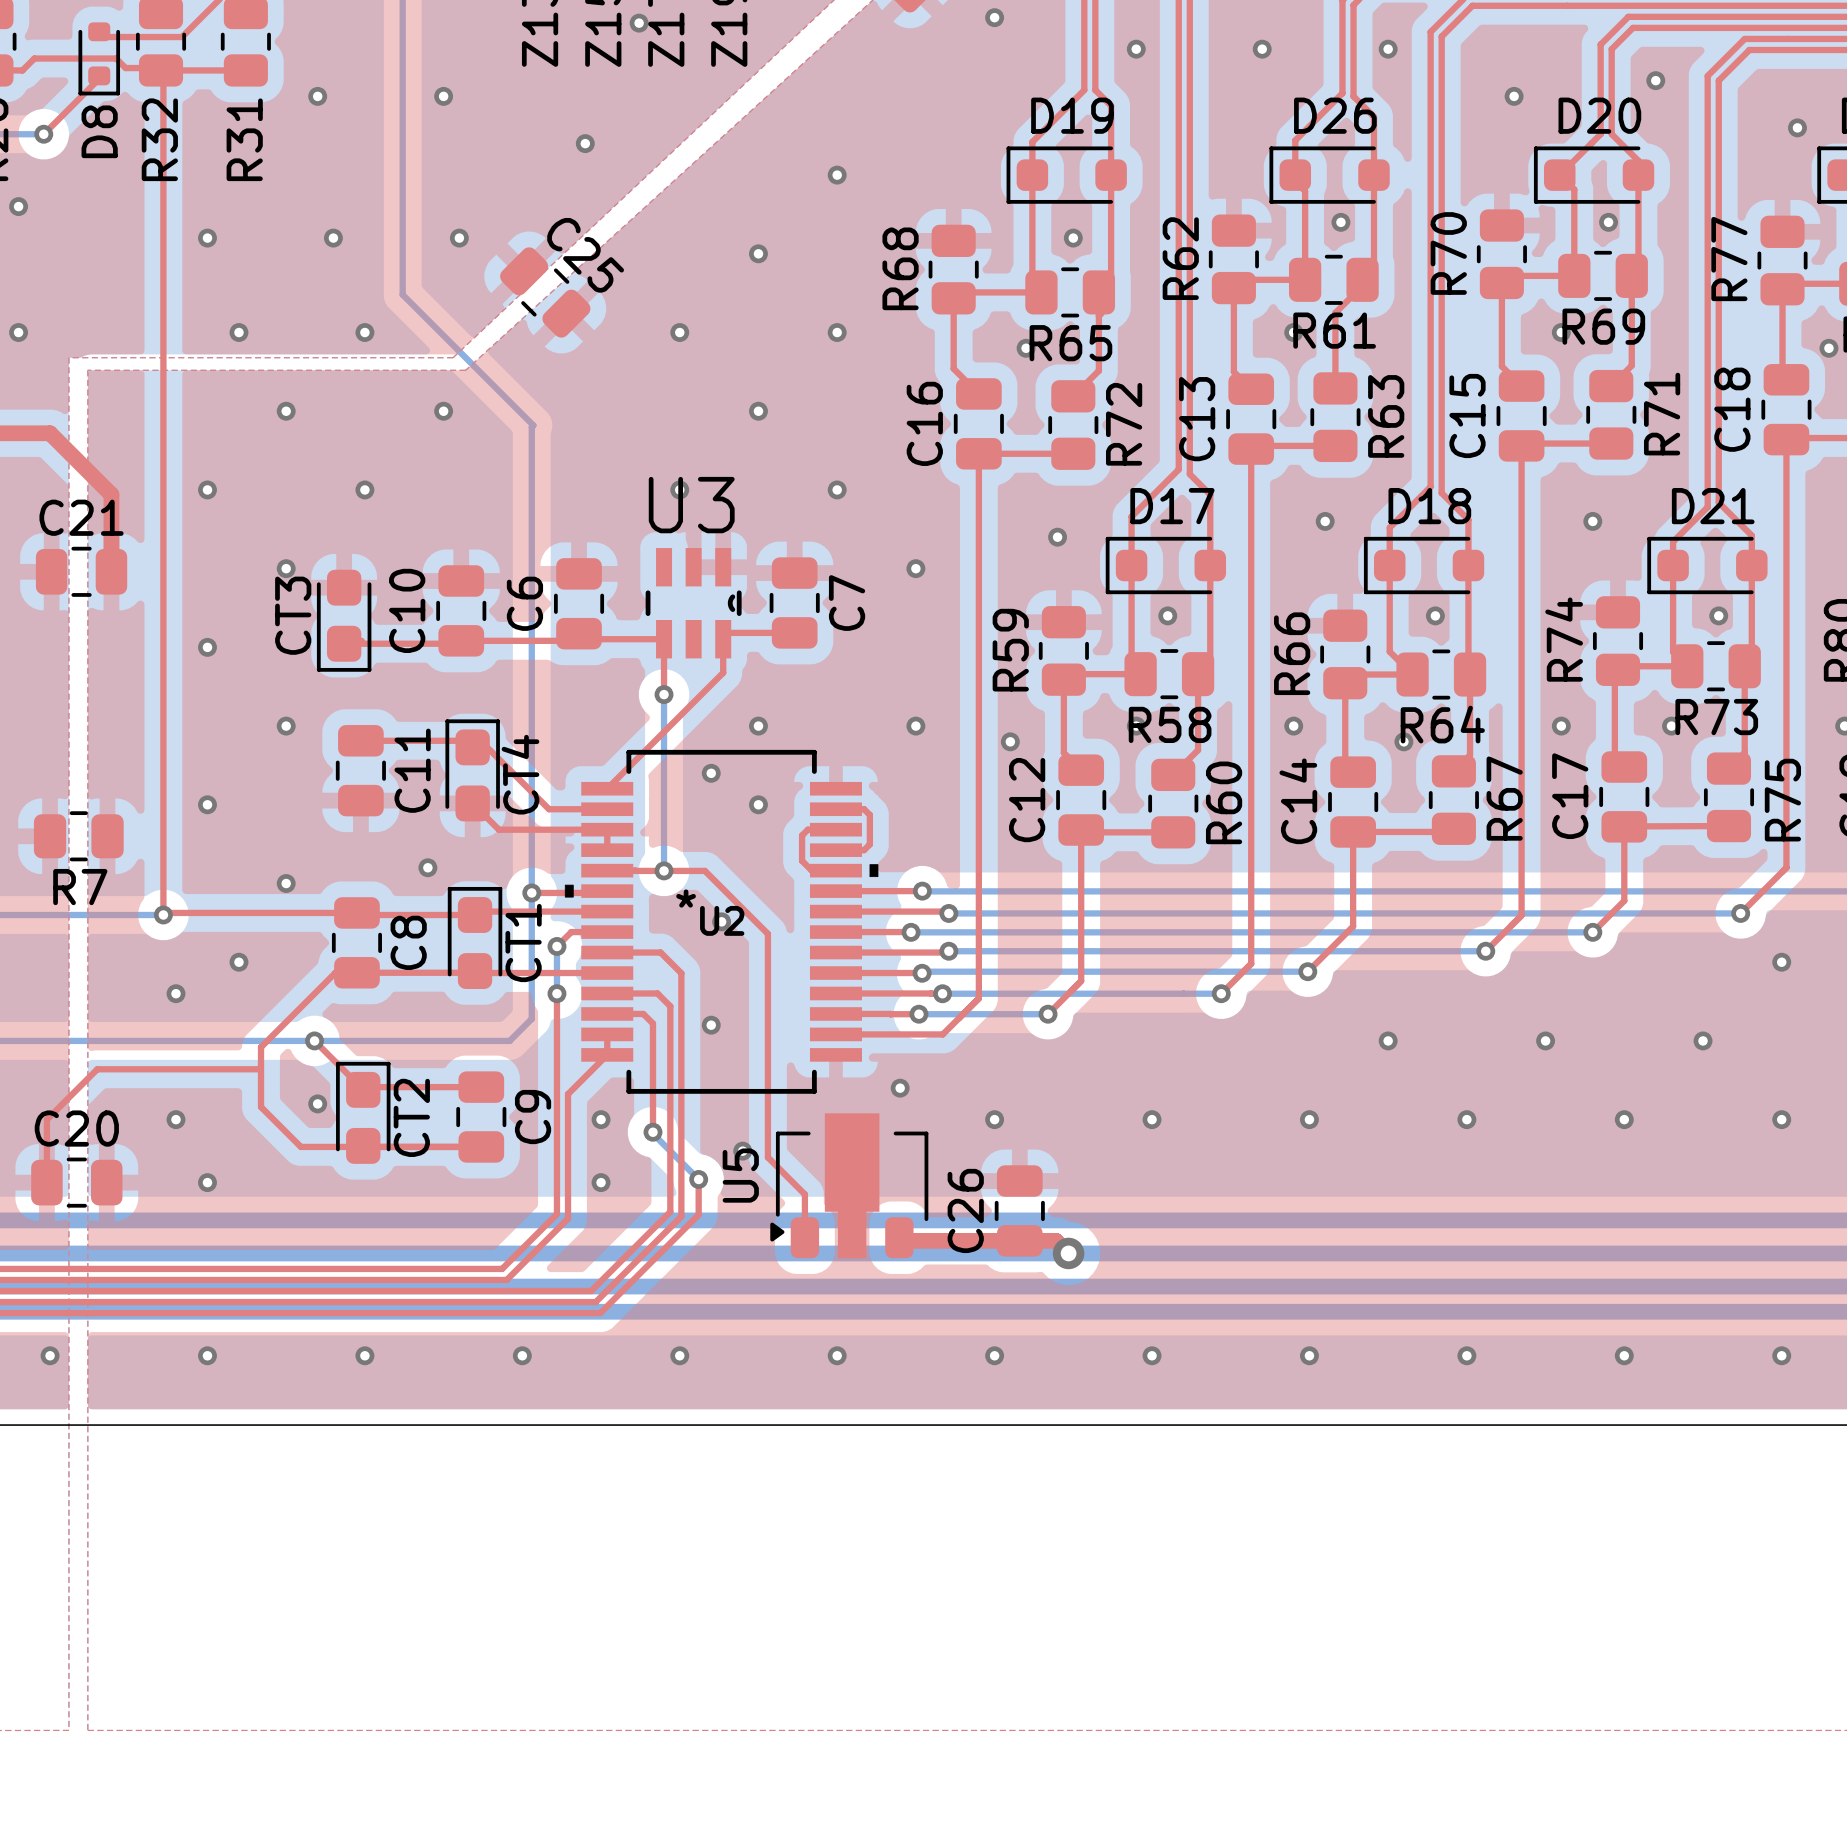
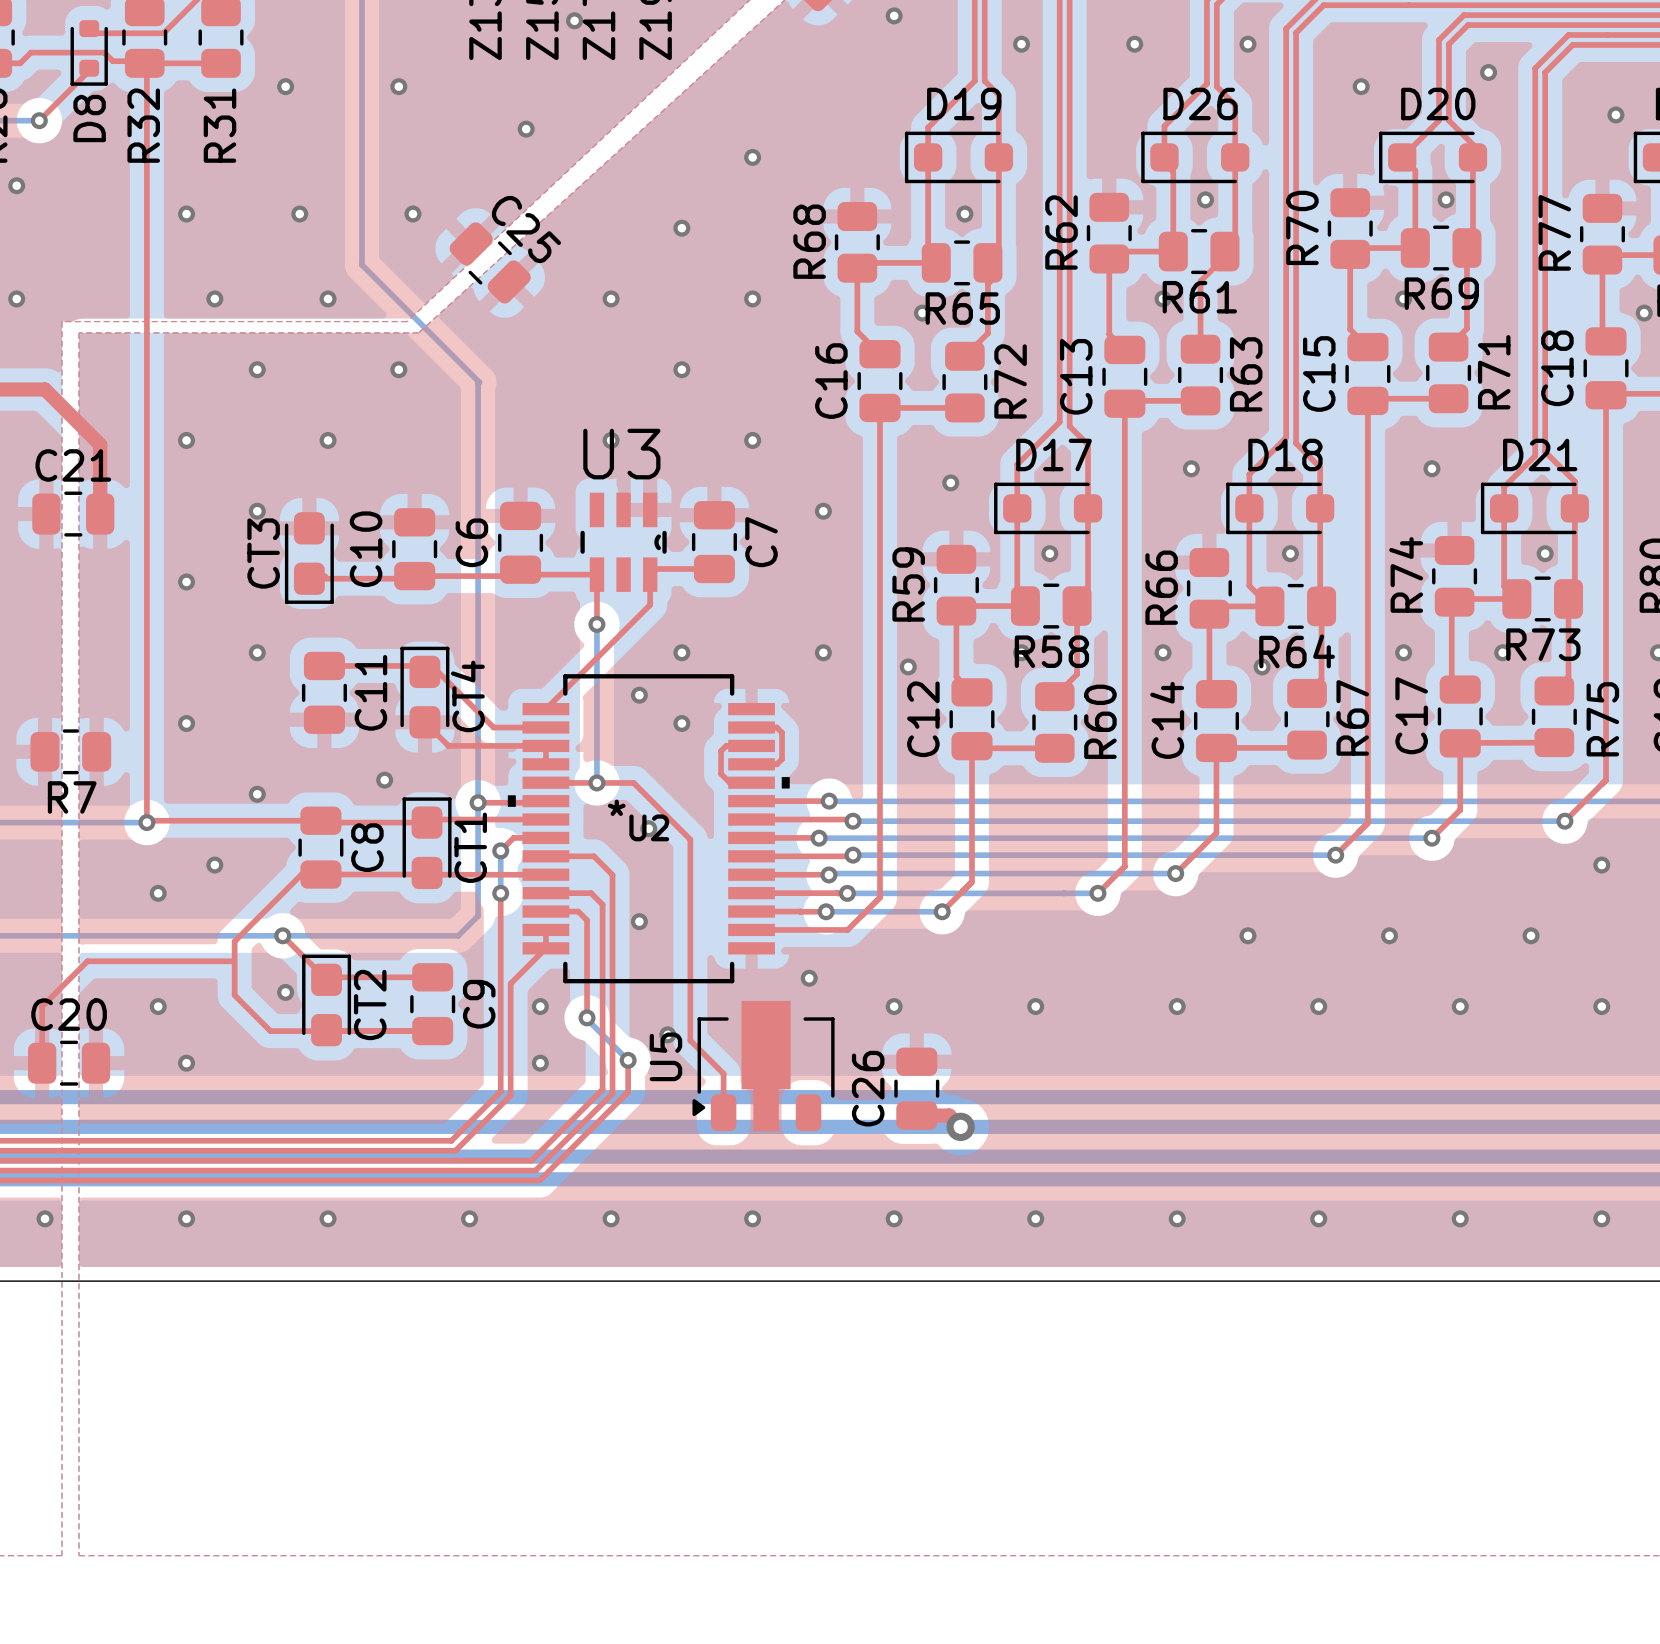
top track: (899, 1237) (902, 1240) (1019, 1240) -> none

